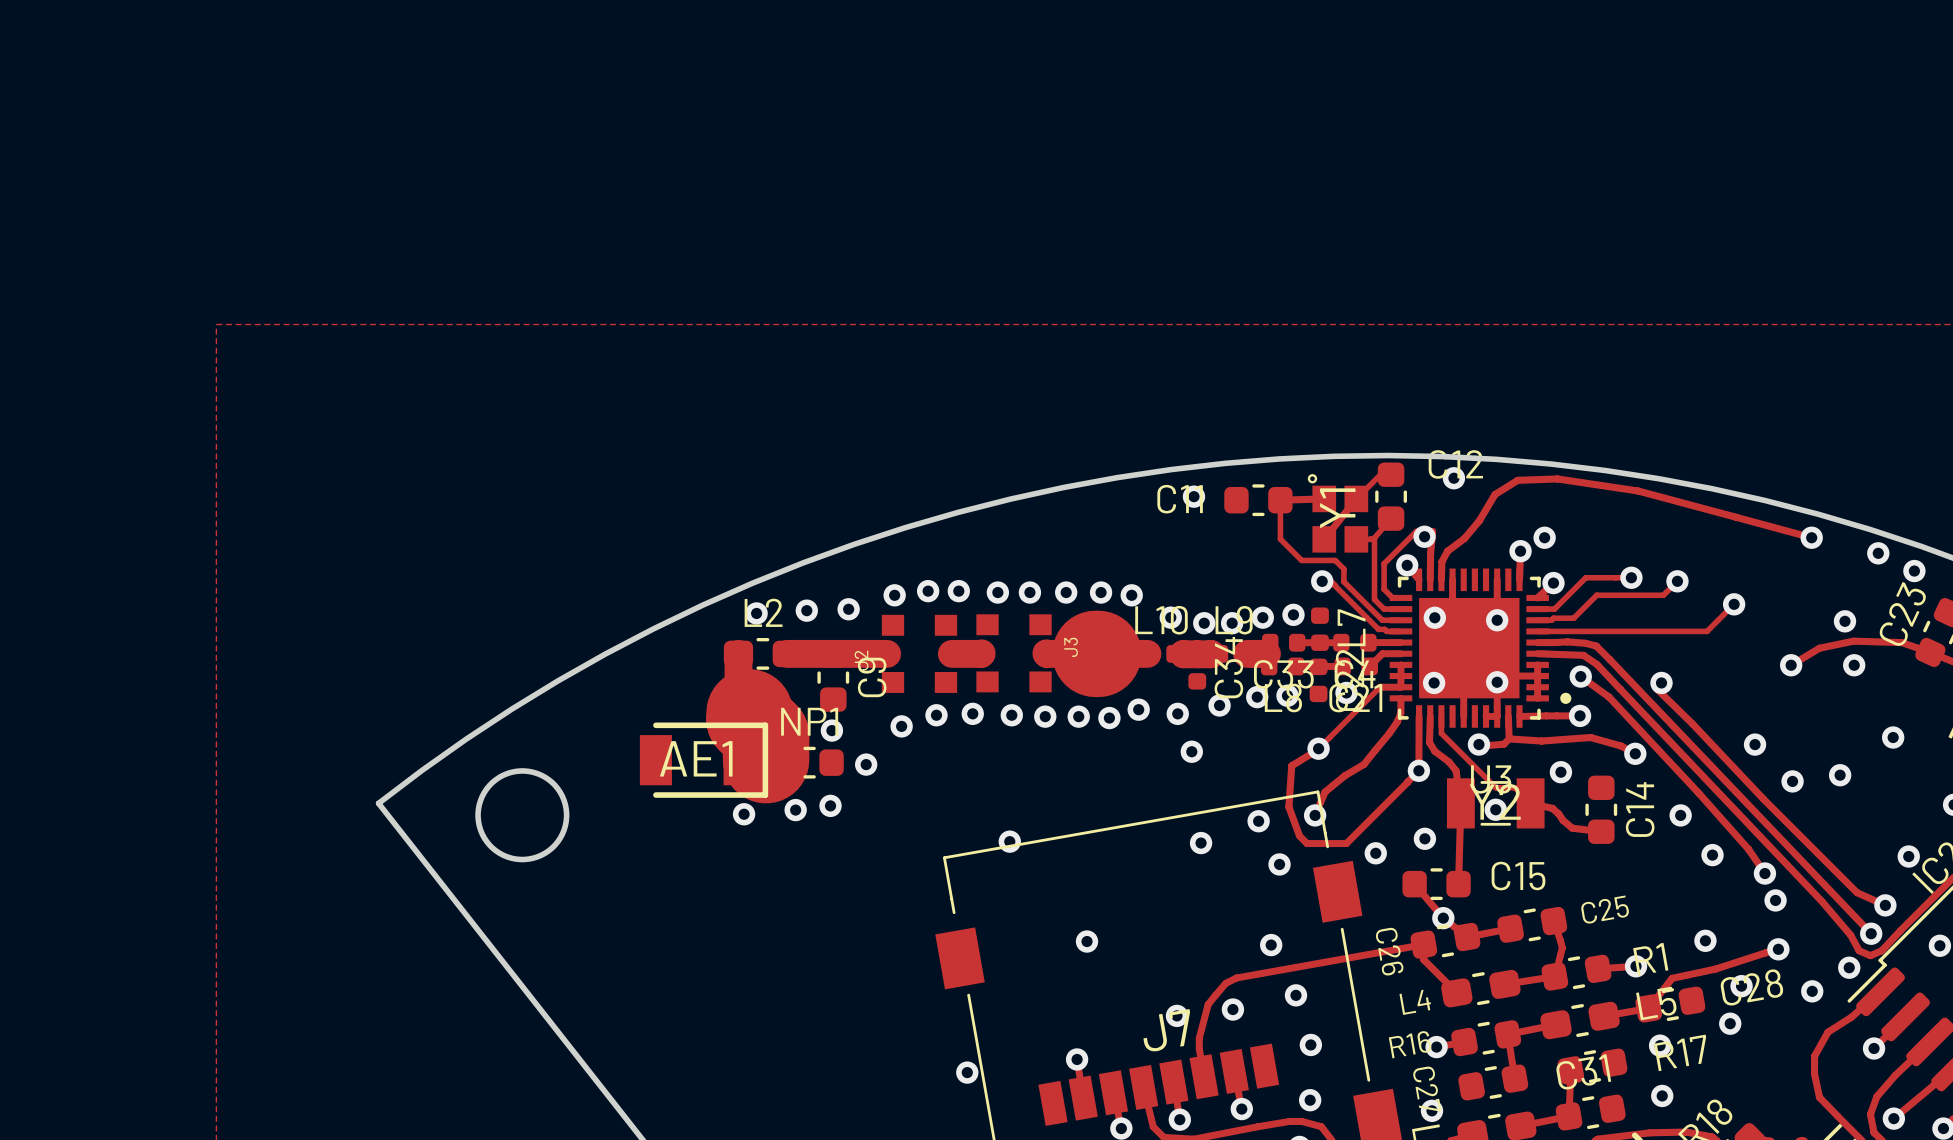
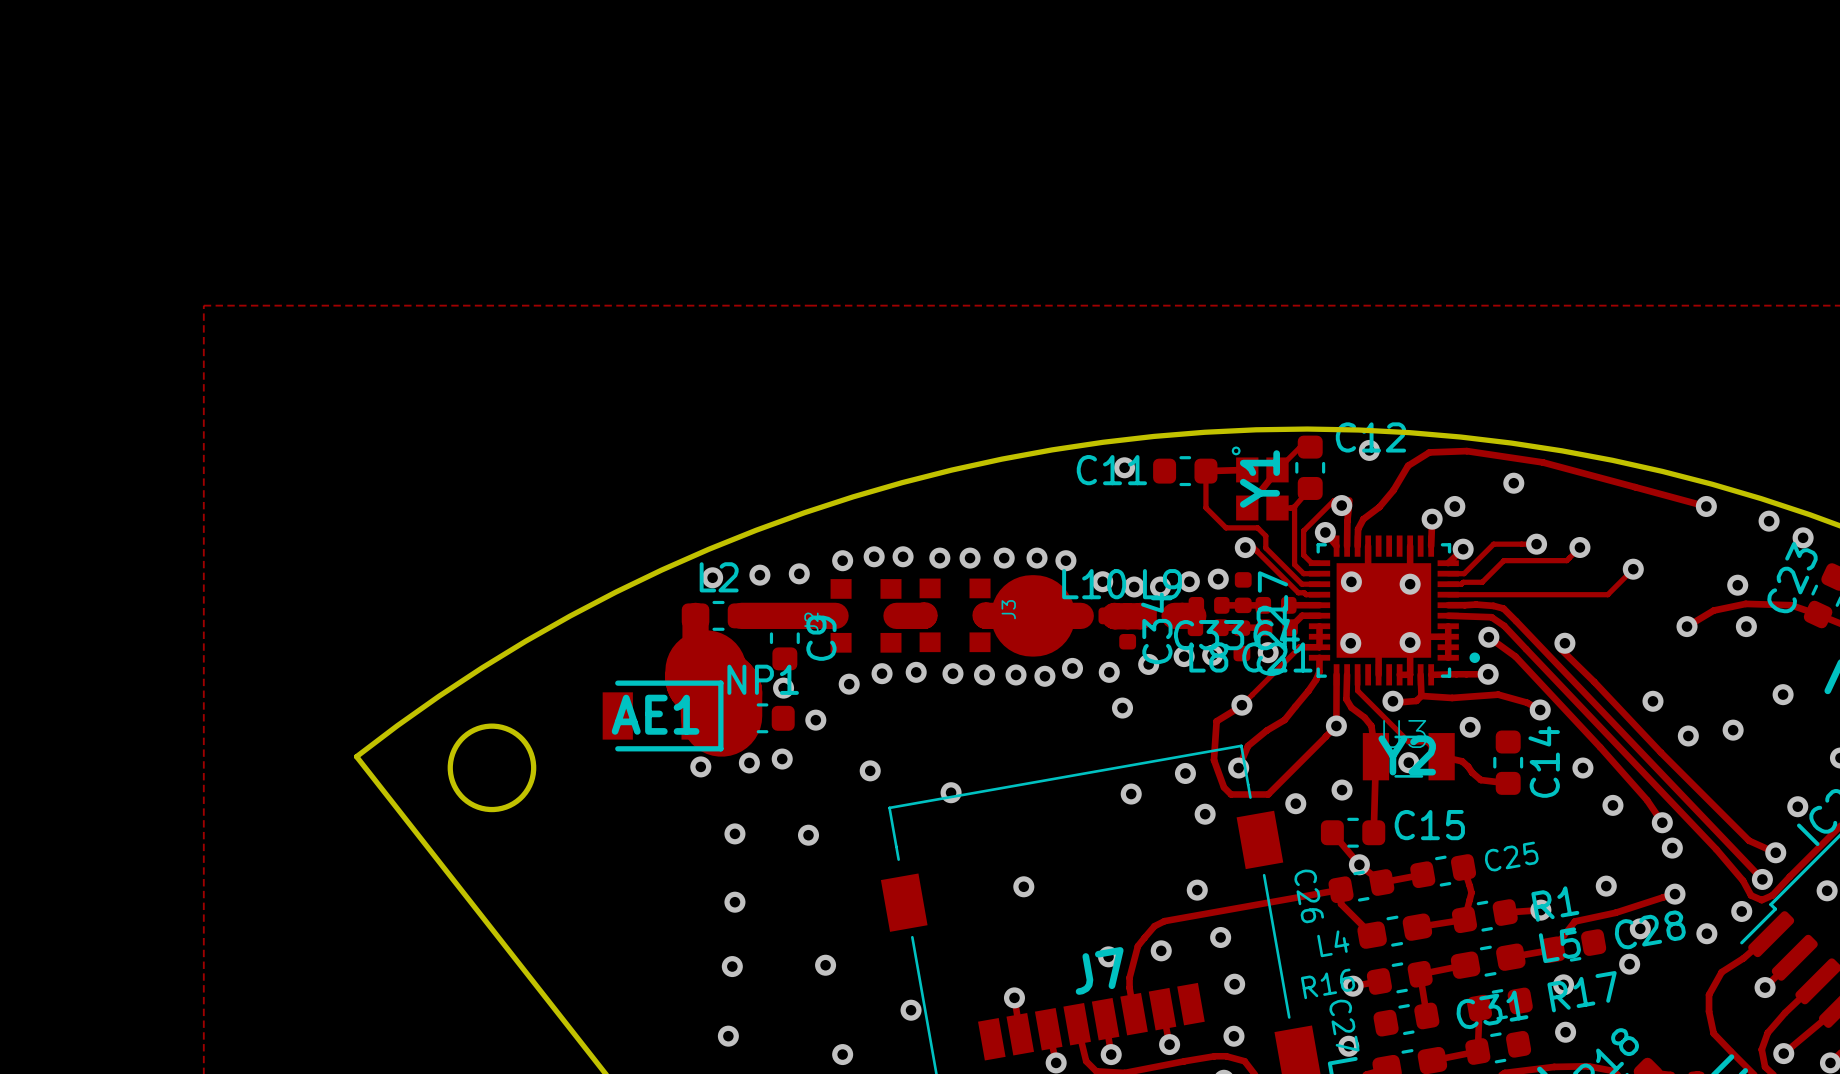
via: none -> (1513, 483)
via: none -> (870, 770)
via: none -> (734, 833)
via: none -> (808, 835)
via: none -> (734, 902)
via: none -> (825, 965)
via: none -> (732, 966)
via: none -> (728, 1036)
via: none -> (842, 1054)

